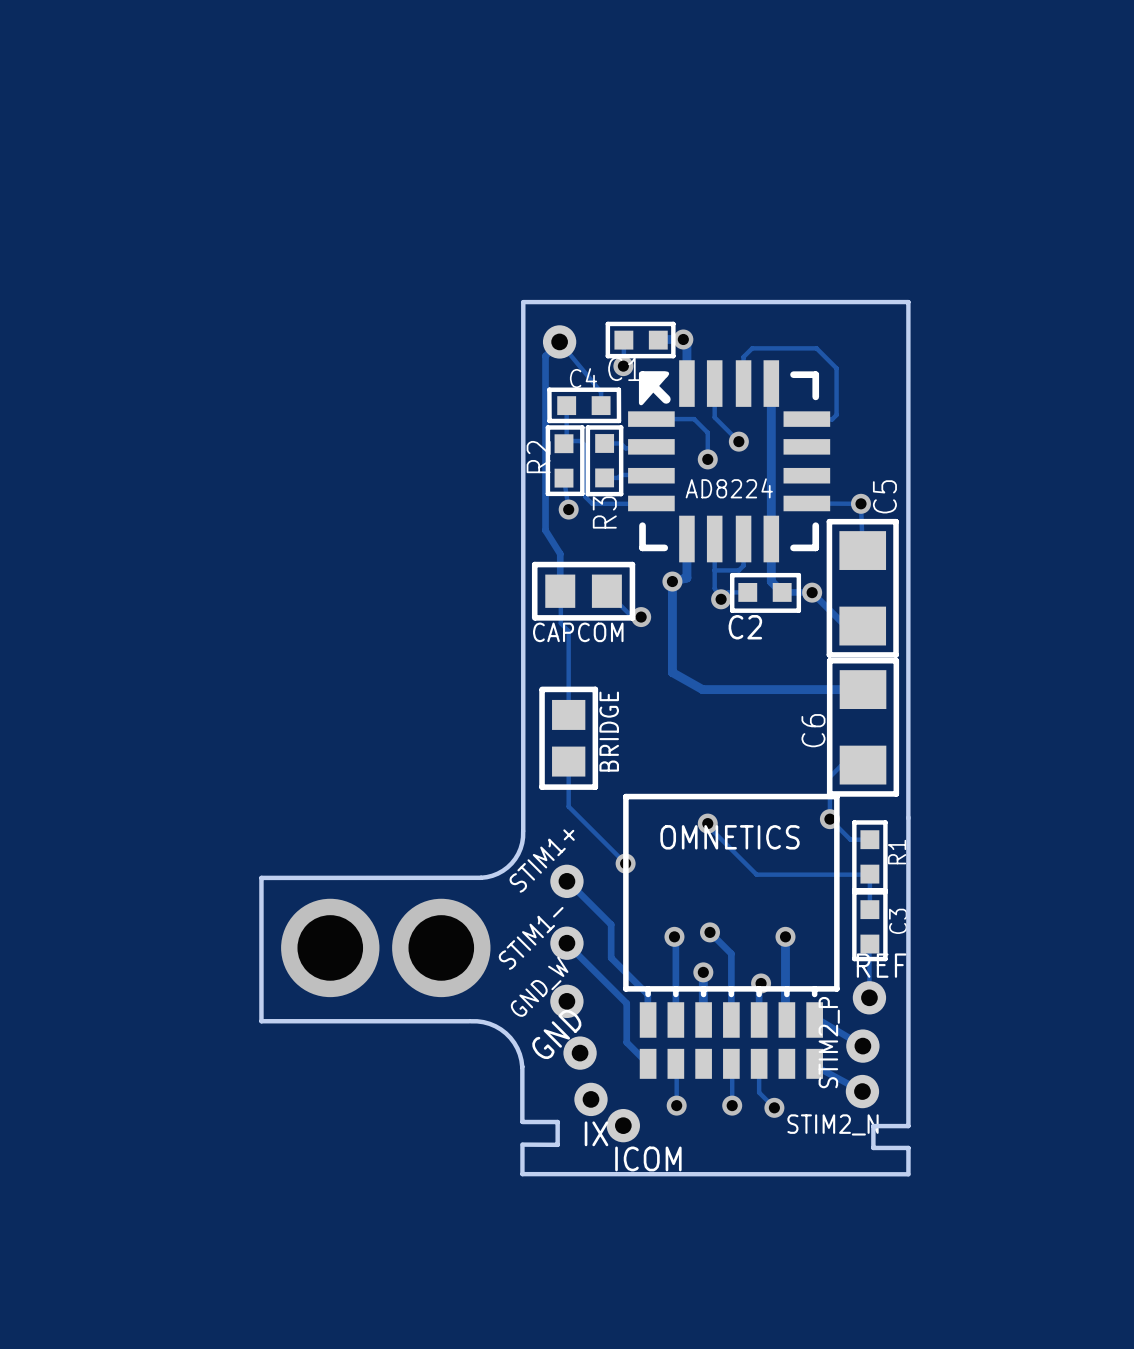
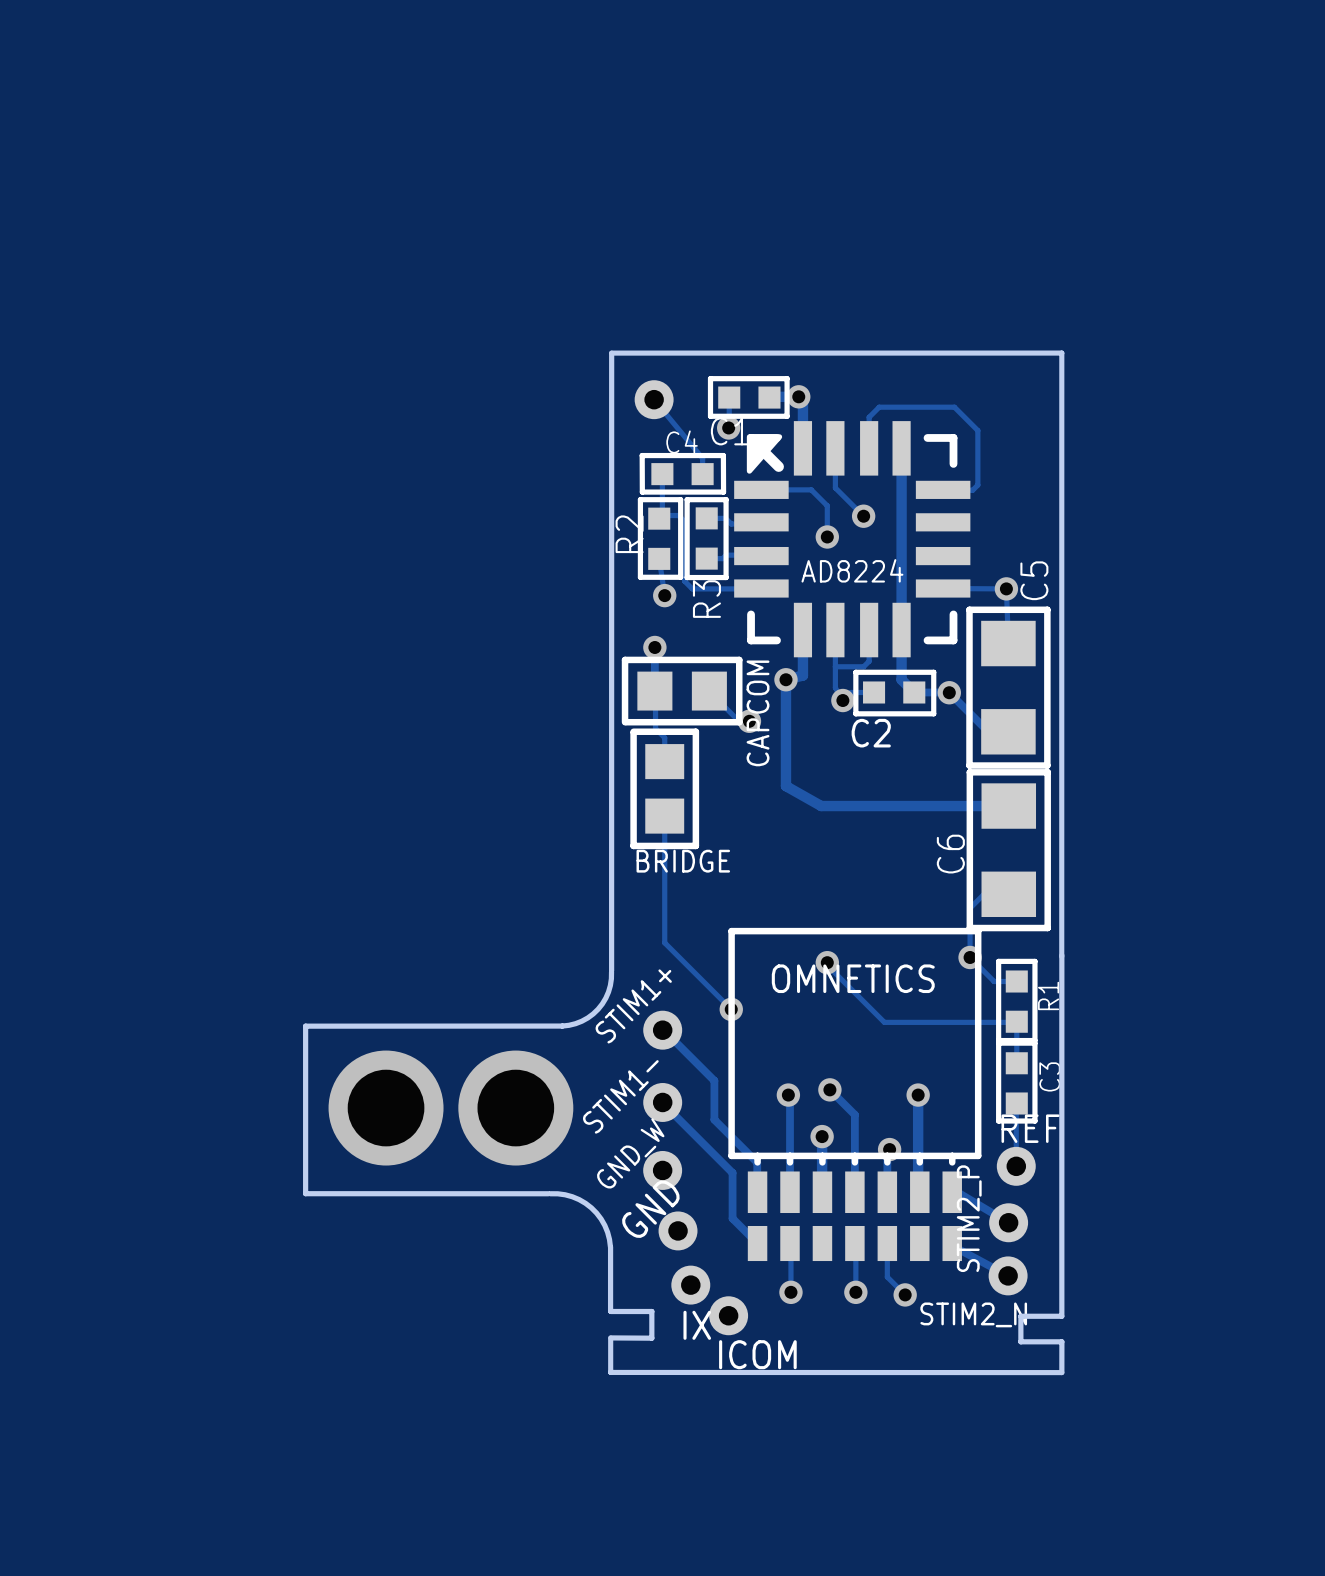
track: (559, 341) (545, 356) (545, 530) (560, 553) -> none
via: none -> (654, 647)
CAPCOM name rotation: 0° (578, 632) -> 90° counterclockwise (758, 713)
track: (568, 651) (568, 698) -> (664, 835) (664, 890)
BRIDGE name rotation: 0° (609, 731) -> 90° clockwise (683, 861)
BRIDGE position: (568, 738) -> (664, 788)

